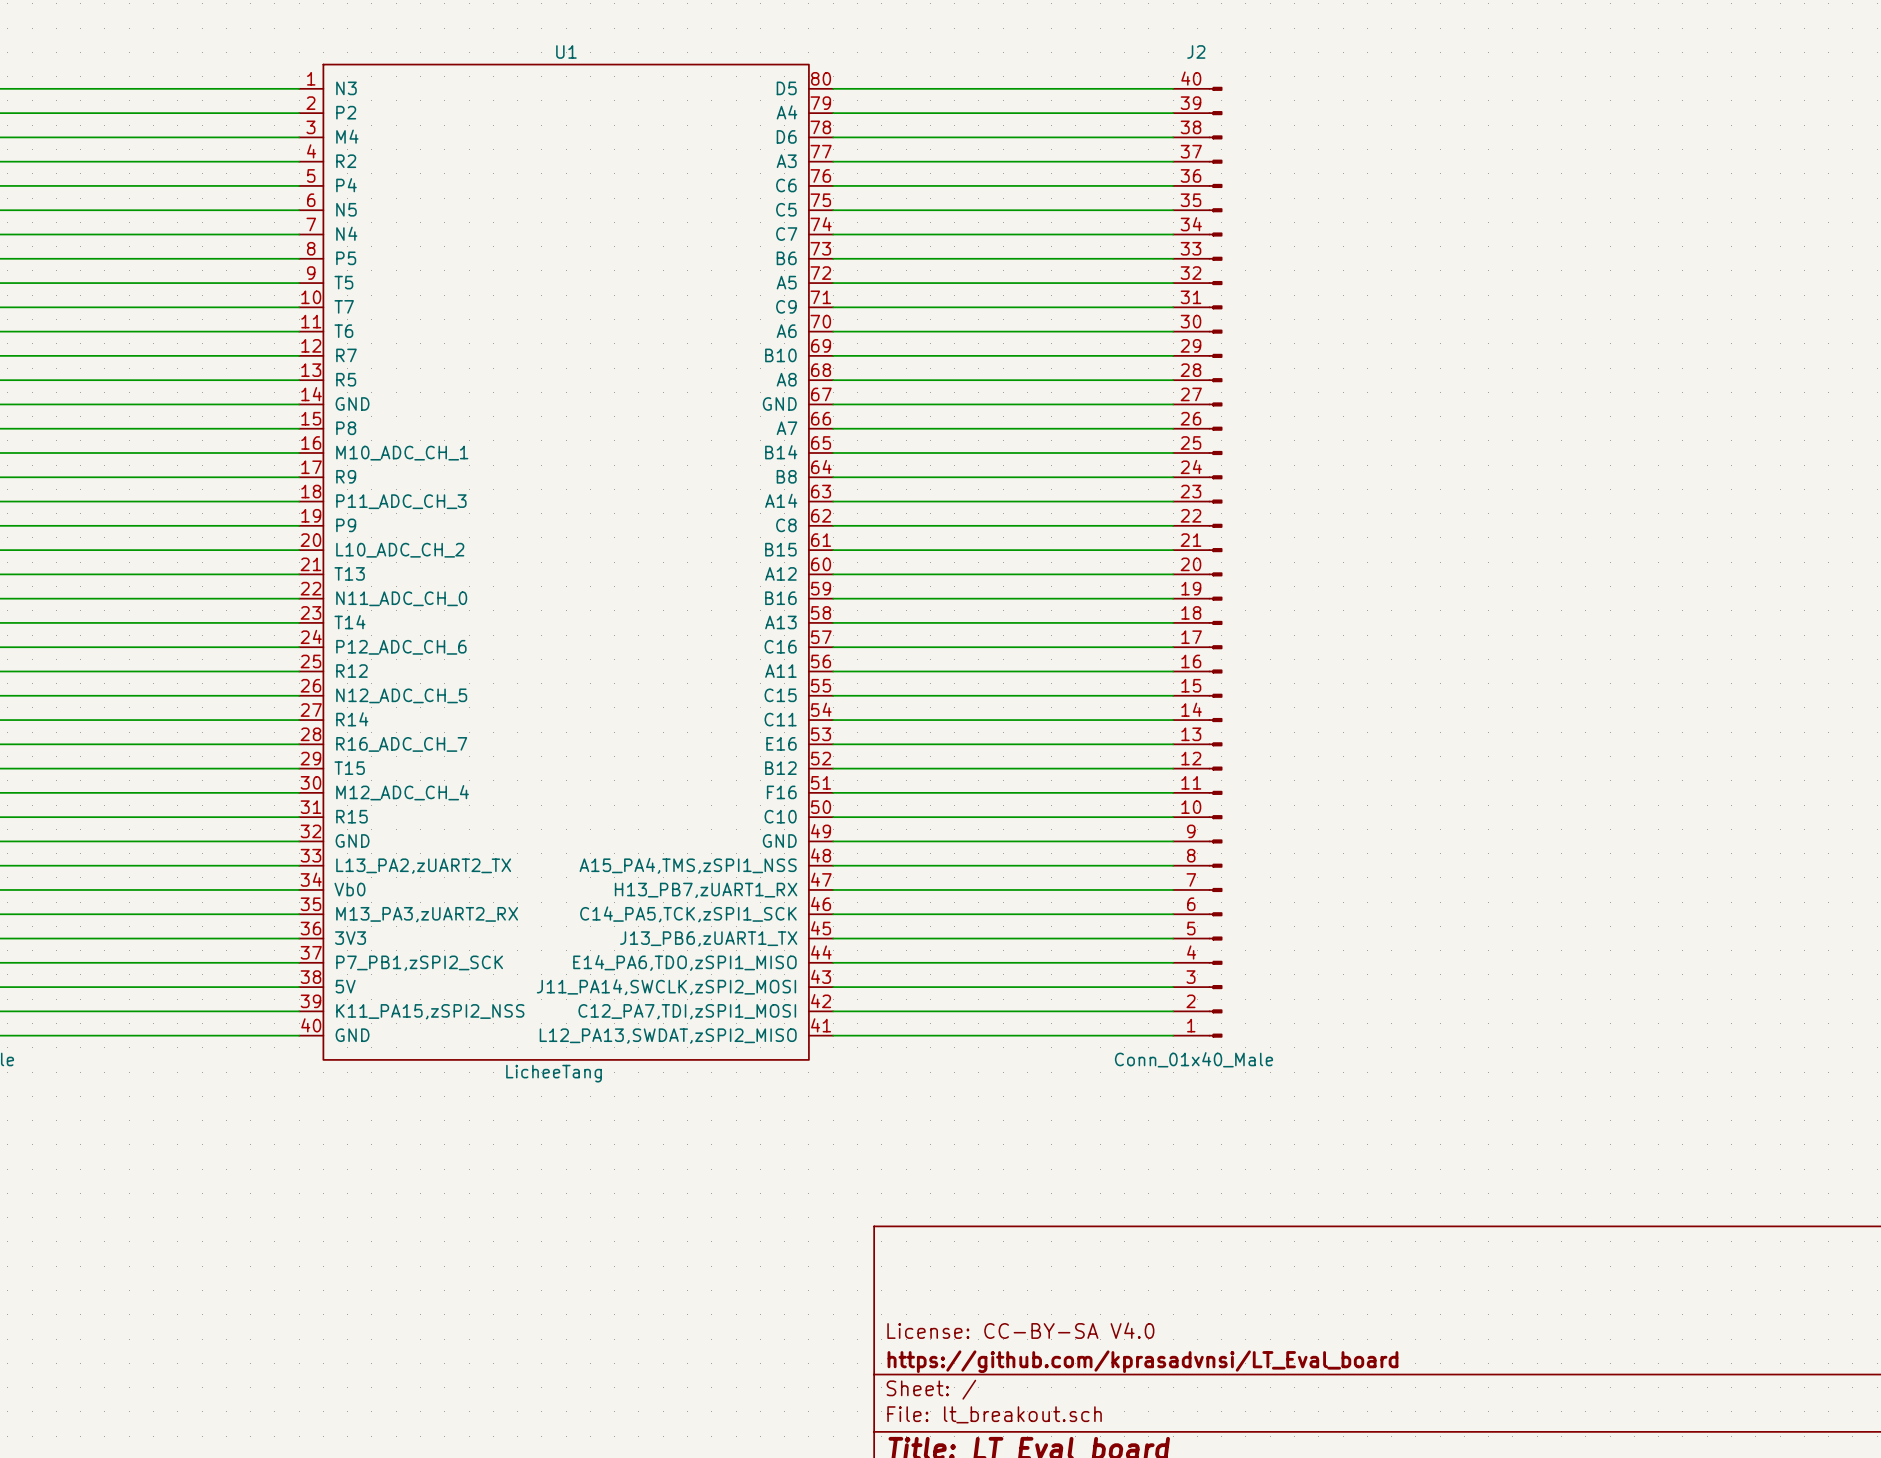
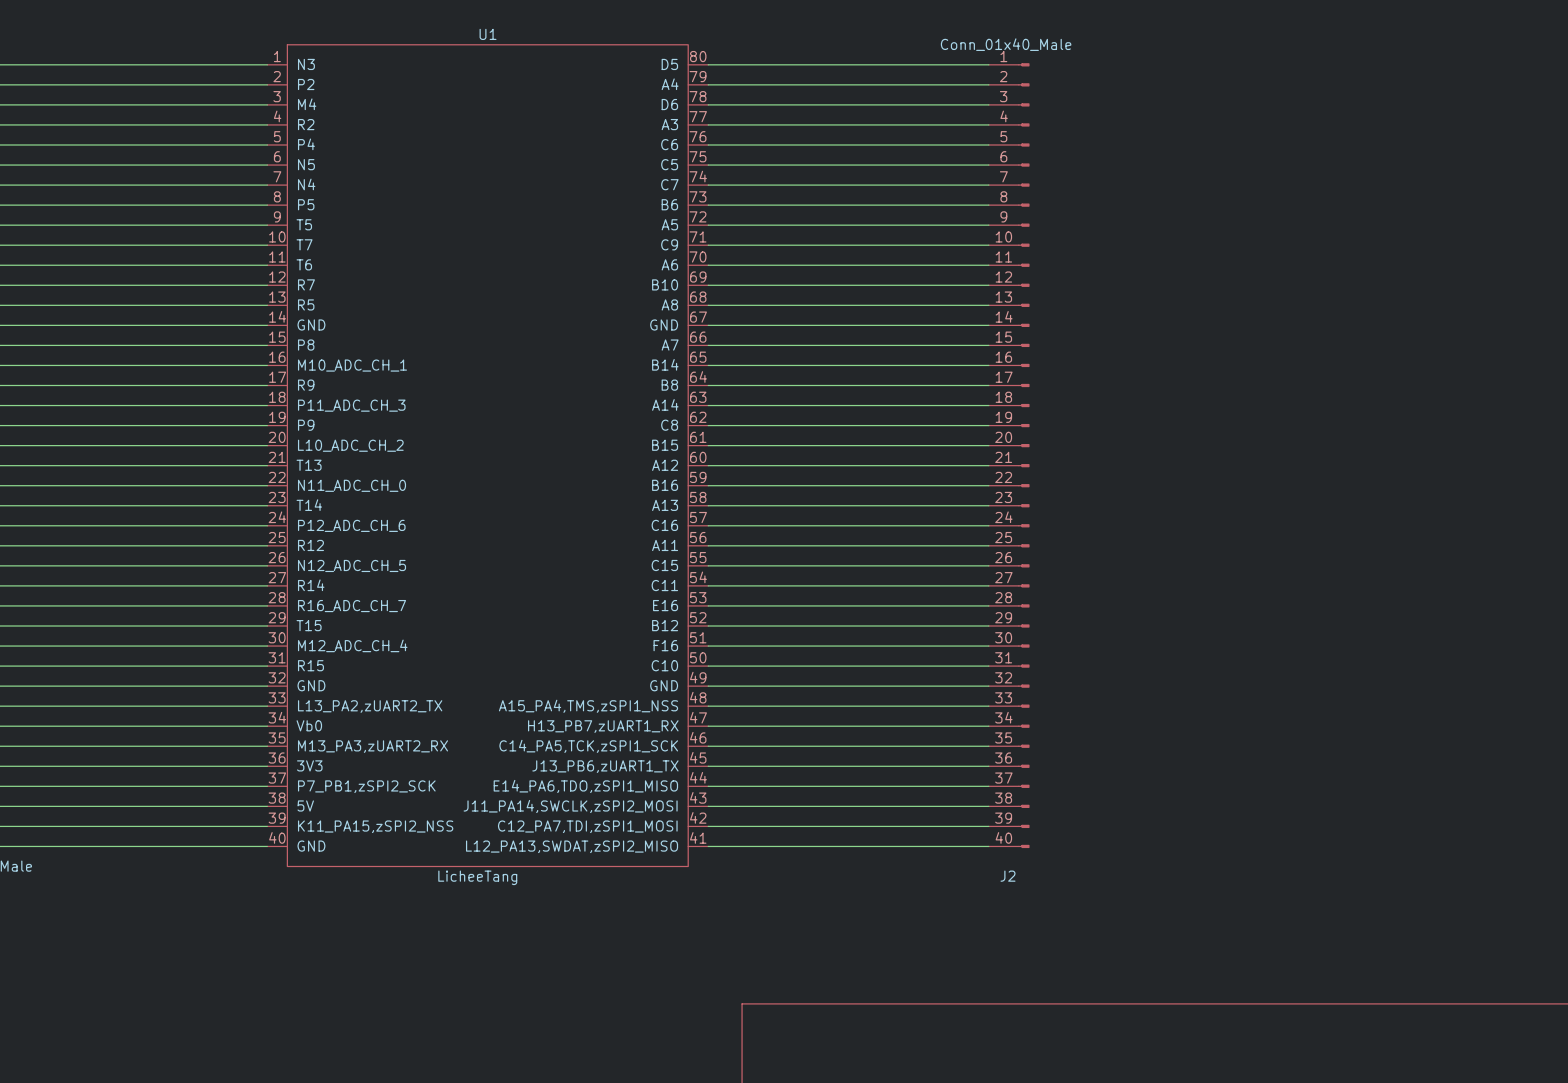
J2 flip: as is (1215, 562) -> up-down (1023, 455)

